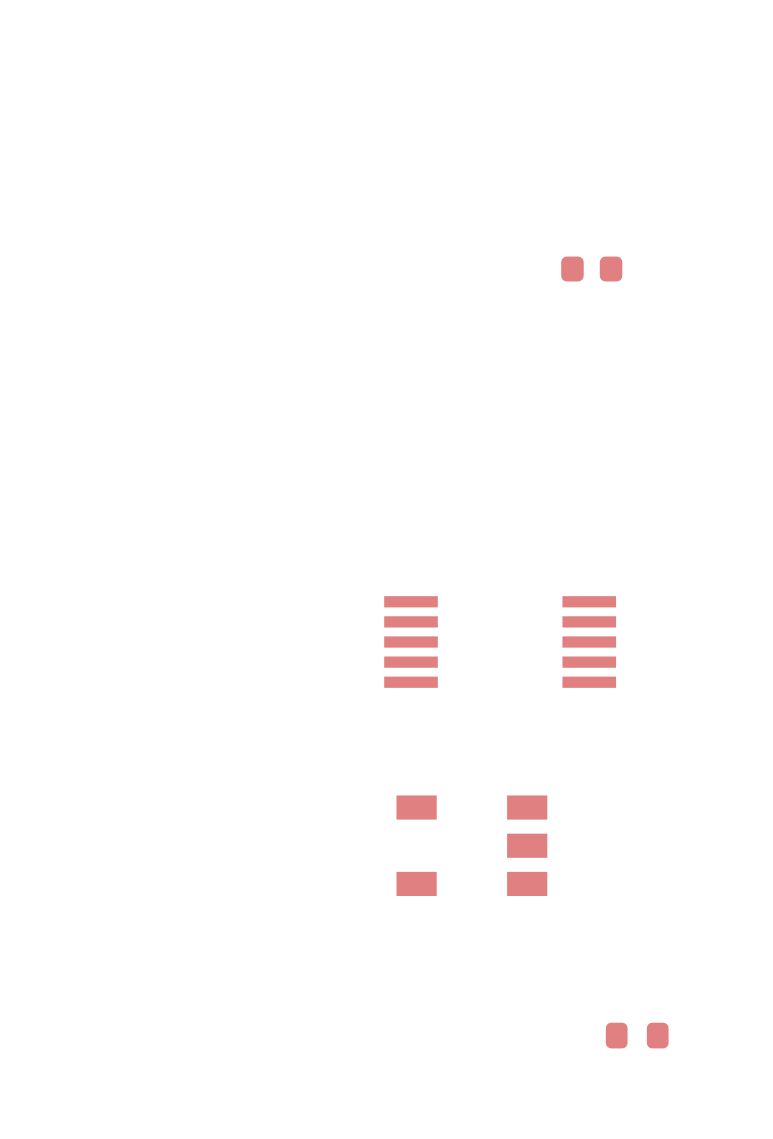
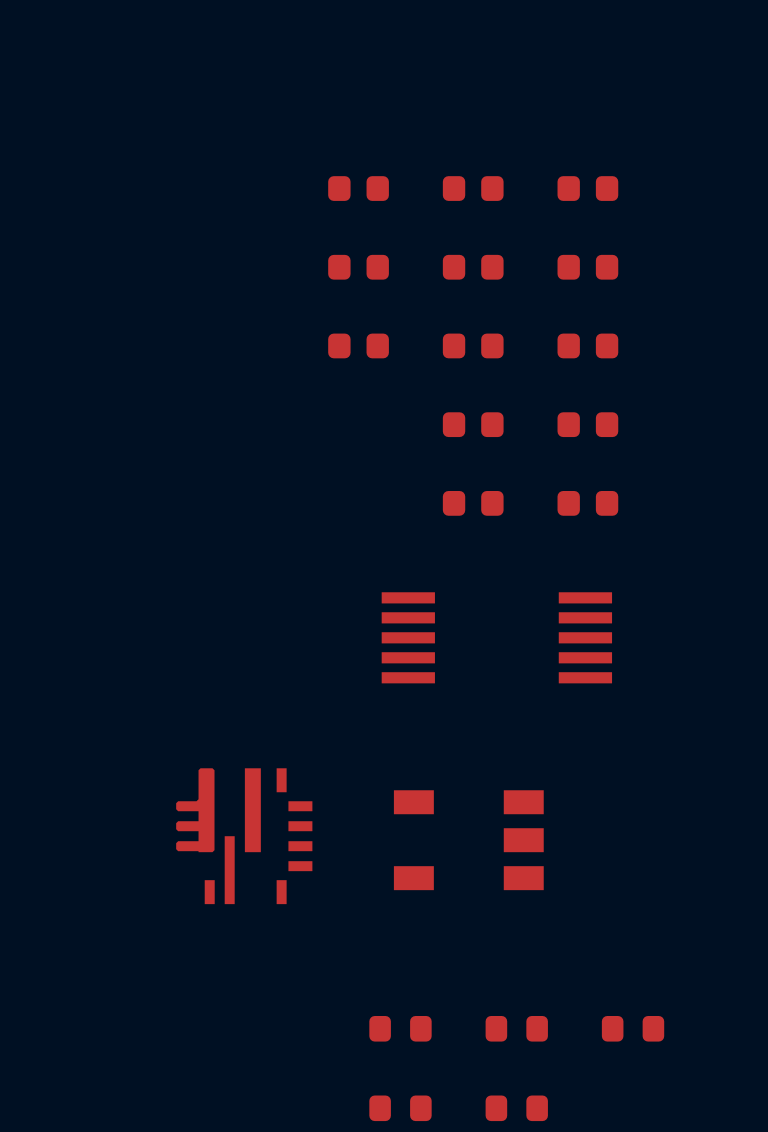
part: none -> (358, 188)
part: none -> (473, 188)
part: none -> (587, 188)
part: none -> (358, 267)
part: none -> (473, 267)
part: none -> (358, 345)
part: none -> (473, 345)
part: none -> (587, 345)
part: none -> (473, 424)
part: none -> (587, 424)
part: none -> (473, 503)
part: none -> (587, 503)
part: none -> (244, 836)
part: none -> (400, 1028)
part: none -> (516, 1028)
part: none -> (400, 1108)
part: none -> (516, 1108)

